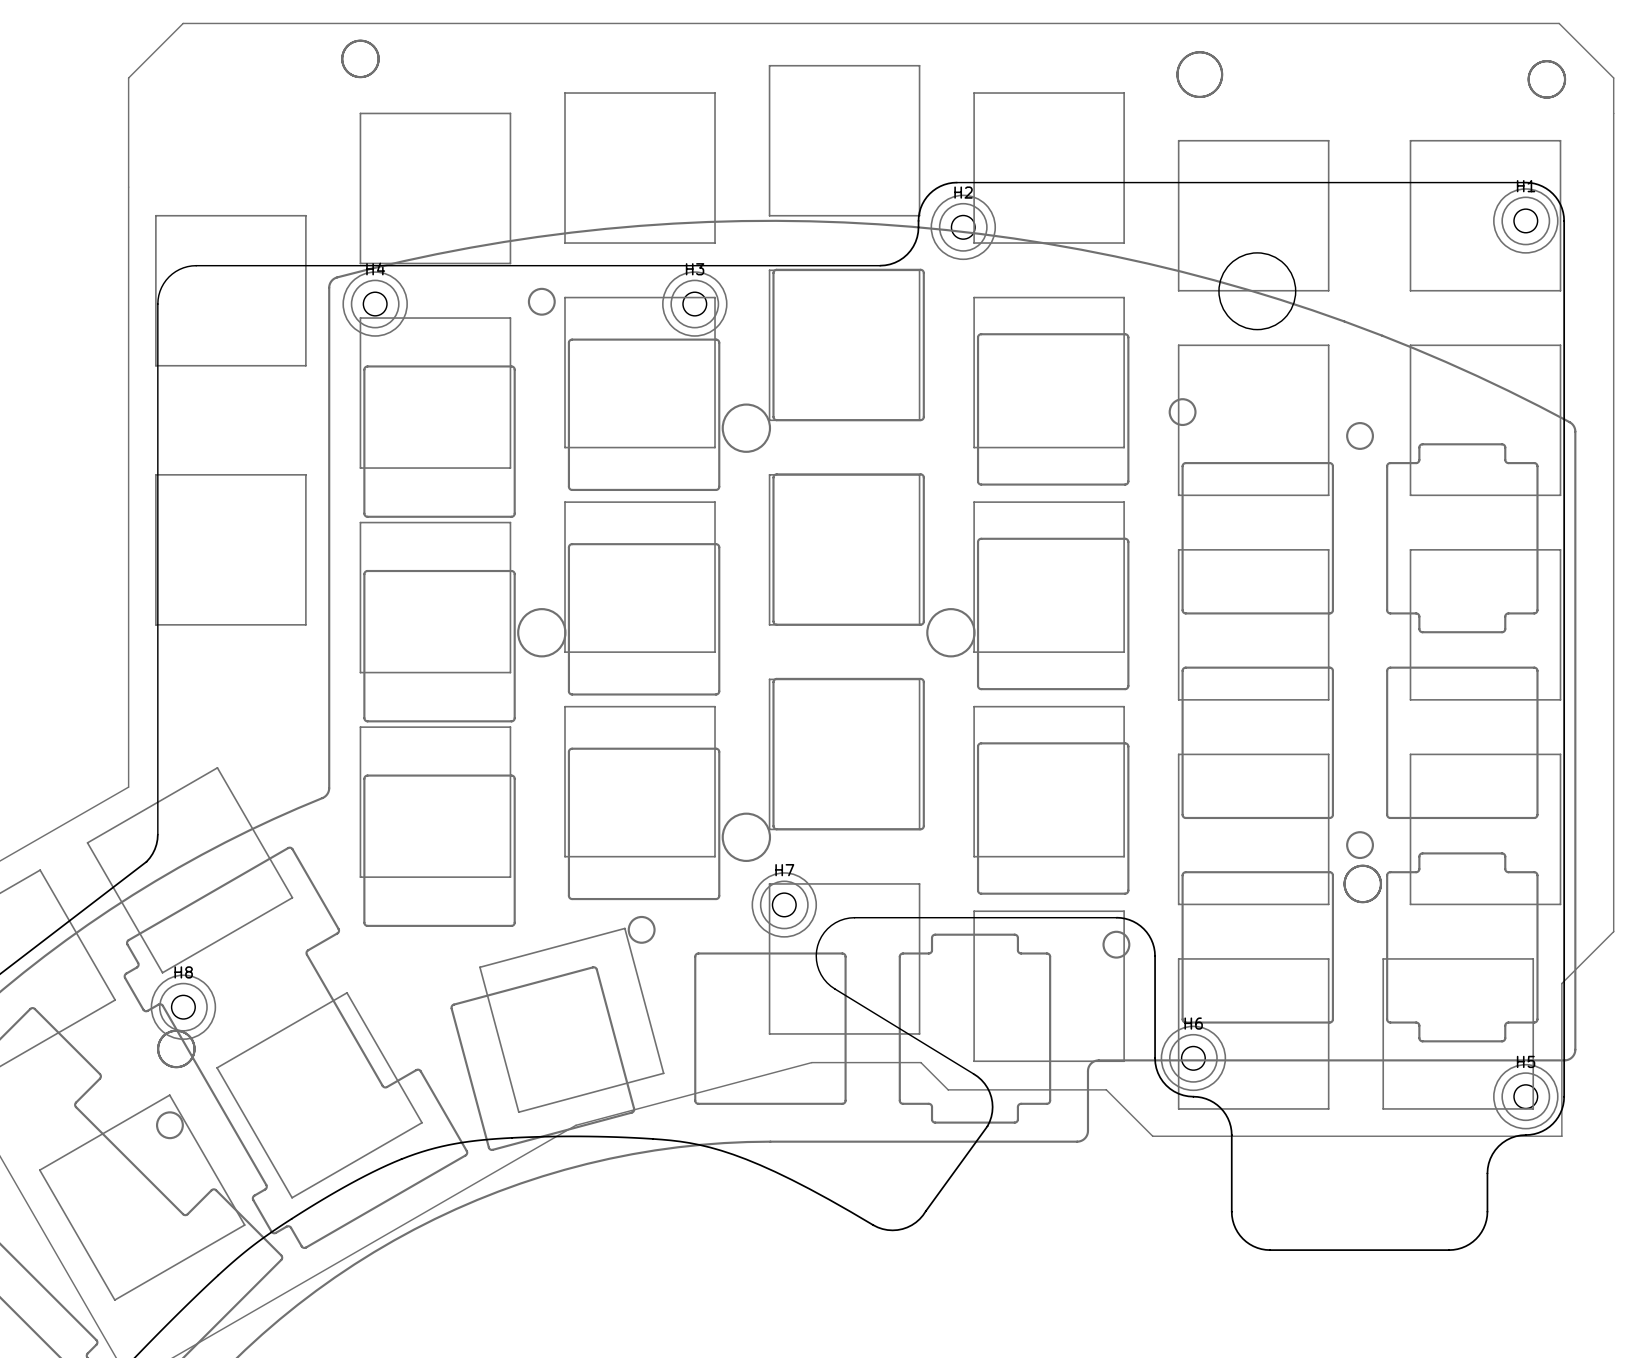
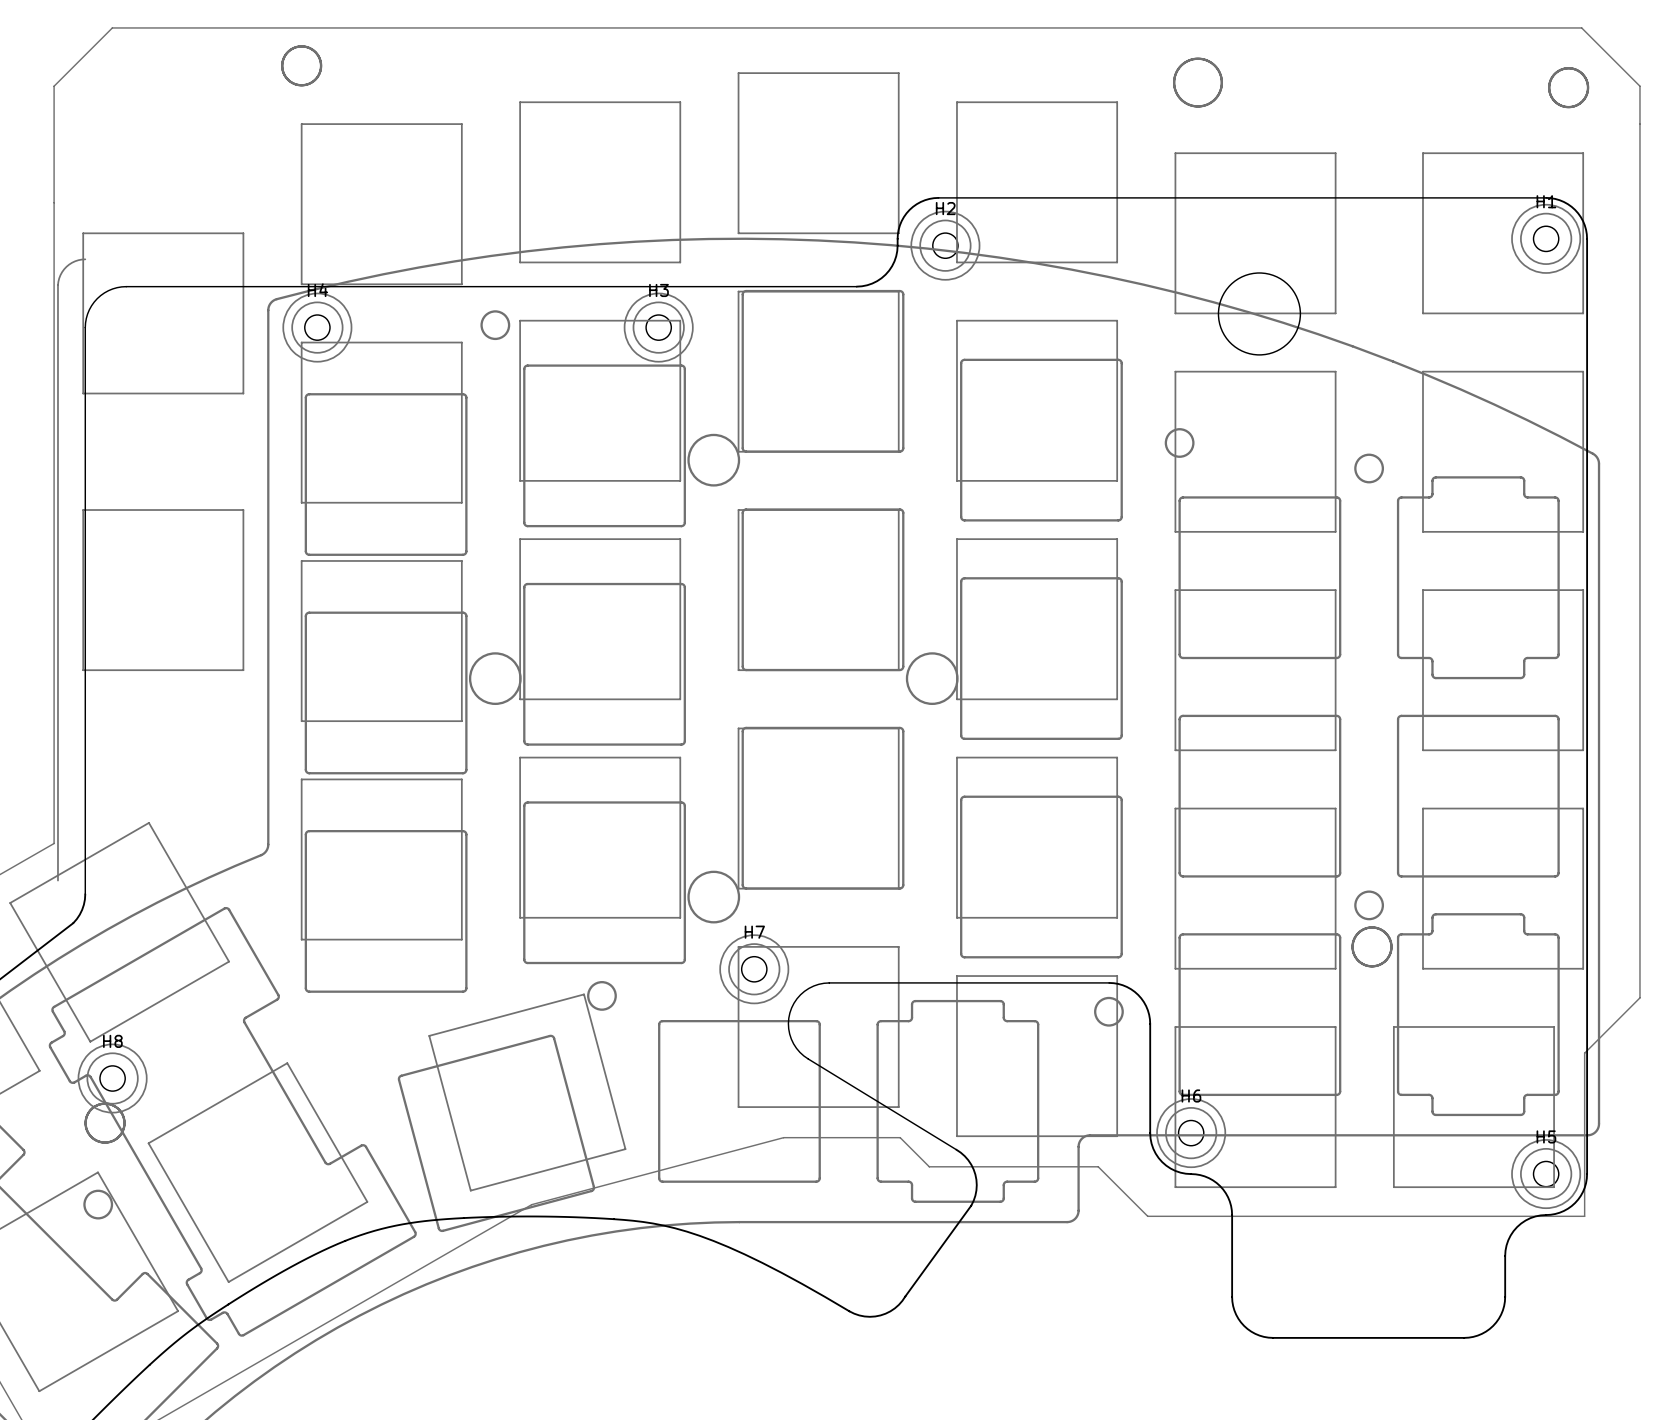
line: none -> (85, 259) (75, 261) (66, 266) (60, 275) (57, 285) (57, 880)

